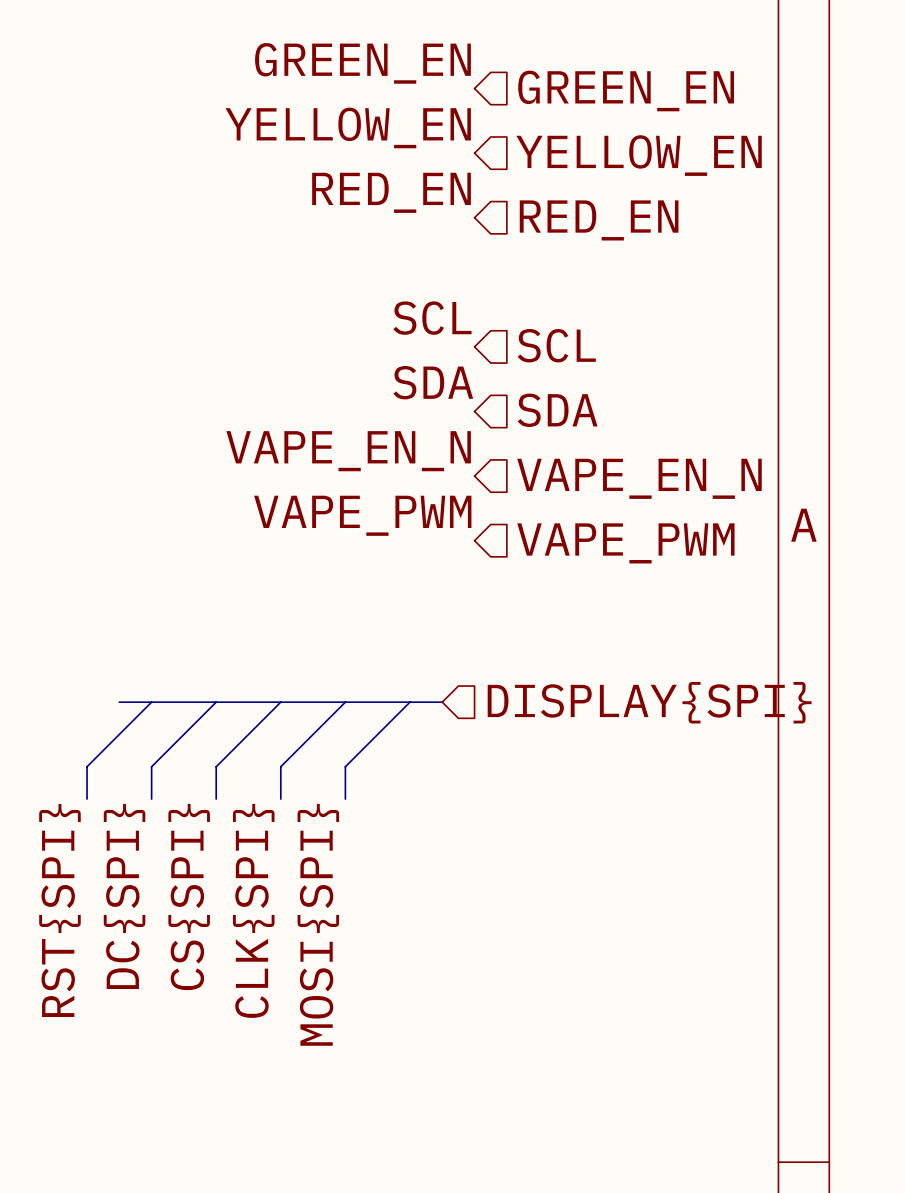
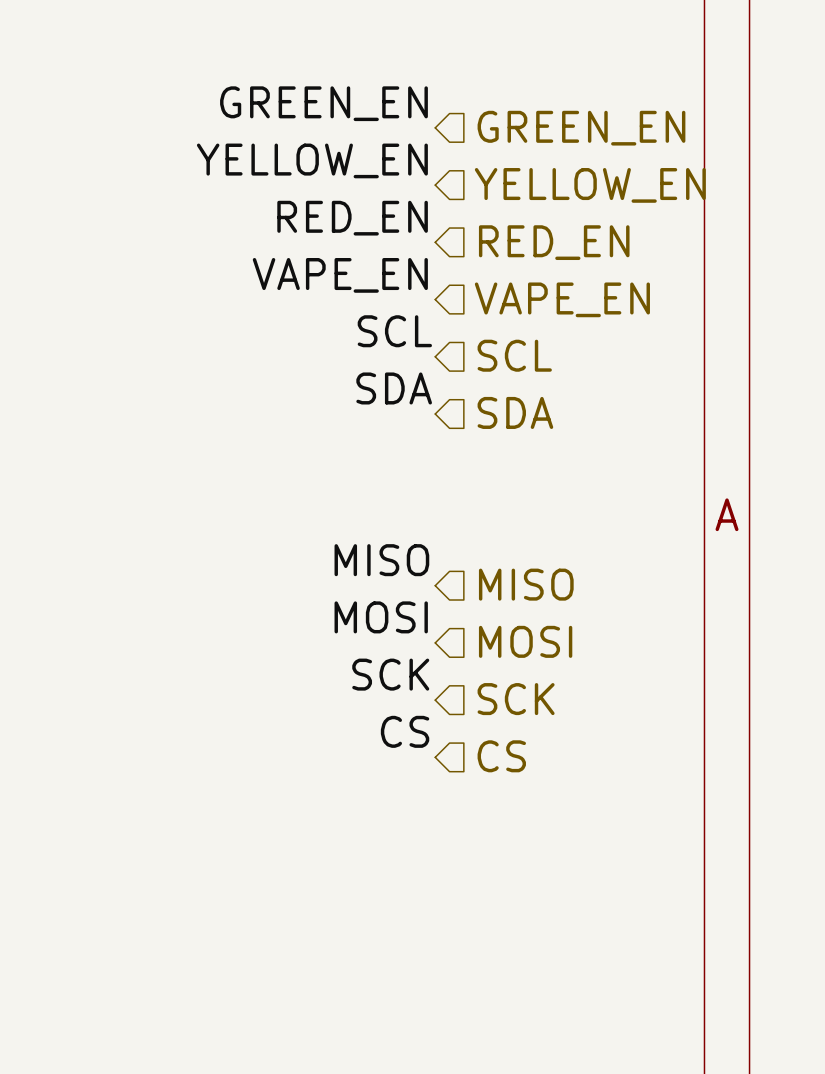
label: none -> VAPE_EN (340, 275)
hierarchical label: none -> VAPE_EN (562, 299)
label: VAPE_EN_N (348, 451) -> none
hierarchical label: VAPE_EN_N (639, 478) -> none
label: VAPE_PWM (362, 515) -> none
hierarchical label: VAPE_PWM (625, 543) -> none
label: none -> MISO (381, 560)
hierarchical label: none -> MISO (526, 584)
label: none -> MOSI (381, 617)
hierarchical label: none -> MOSI (525, 641)
bus: (119, 702) (442, 702) -> none
wire: (151, 702) (87, 766) (87, 799) -> none
wire: (216, 702) (151, 766) (151, 799) -> none
wire: (280, 702) (216, 766) (216, 799) -> none
wire: (345, 702) (280, 766) (280, 799) -> none
wire: (409, 702) (345, 766) (345, 799) -> none
hierarchical label: DISPLAY{SPI} (649, 702) -> none
label: none -> SCK (390, 674)
hierarchical label: none -> SCK (516, 699)
label: none -> CS (405, 731)
hierarchical label: none -> CS (501, 756)
label: DC{SPI} (124, 896) -> none
label: CS{SPI} (189, 897) -> none
label: RST{SPI} (59, 910) -> none
label: CLK{SPI} (253, 910) -> none
label: MOSI{SPI} (318, 924) -> none

